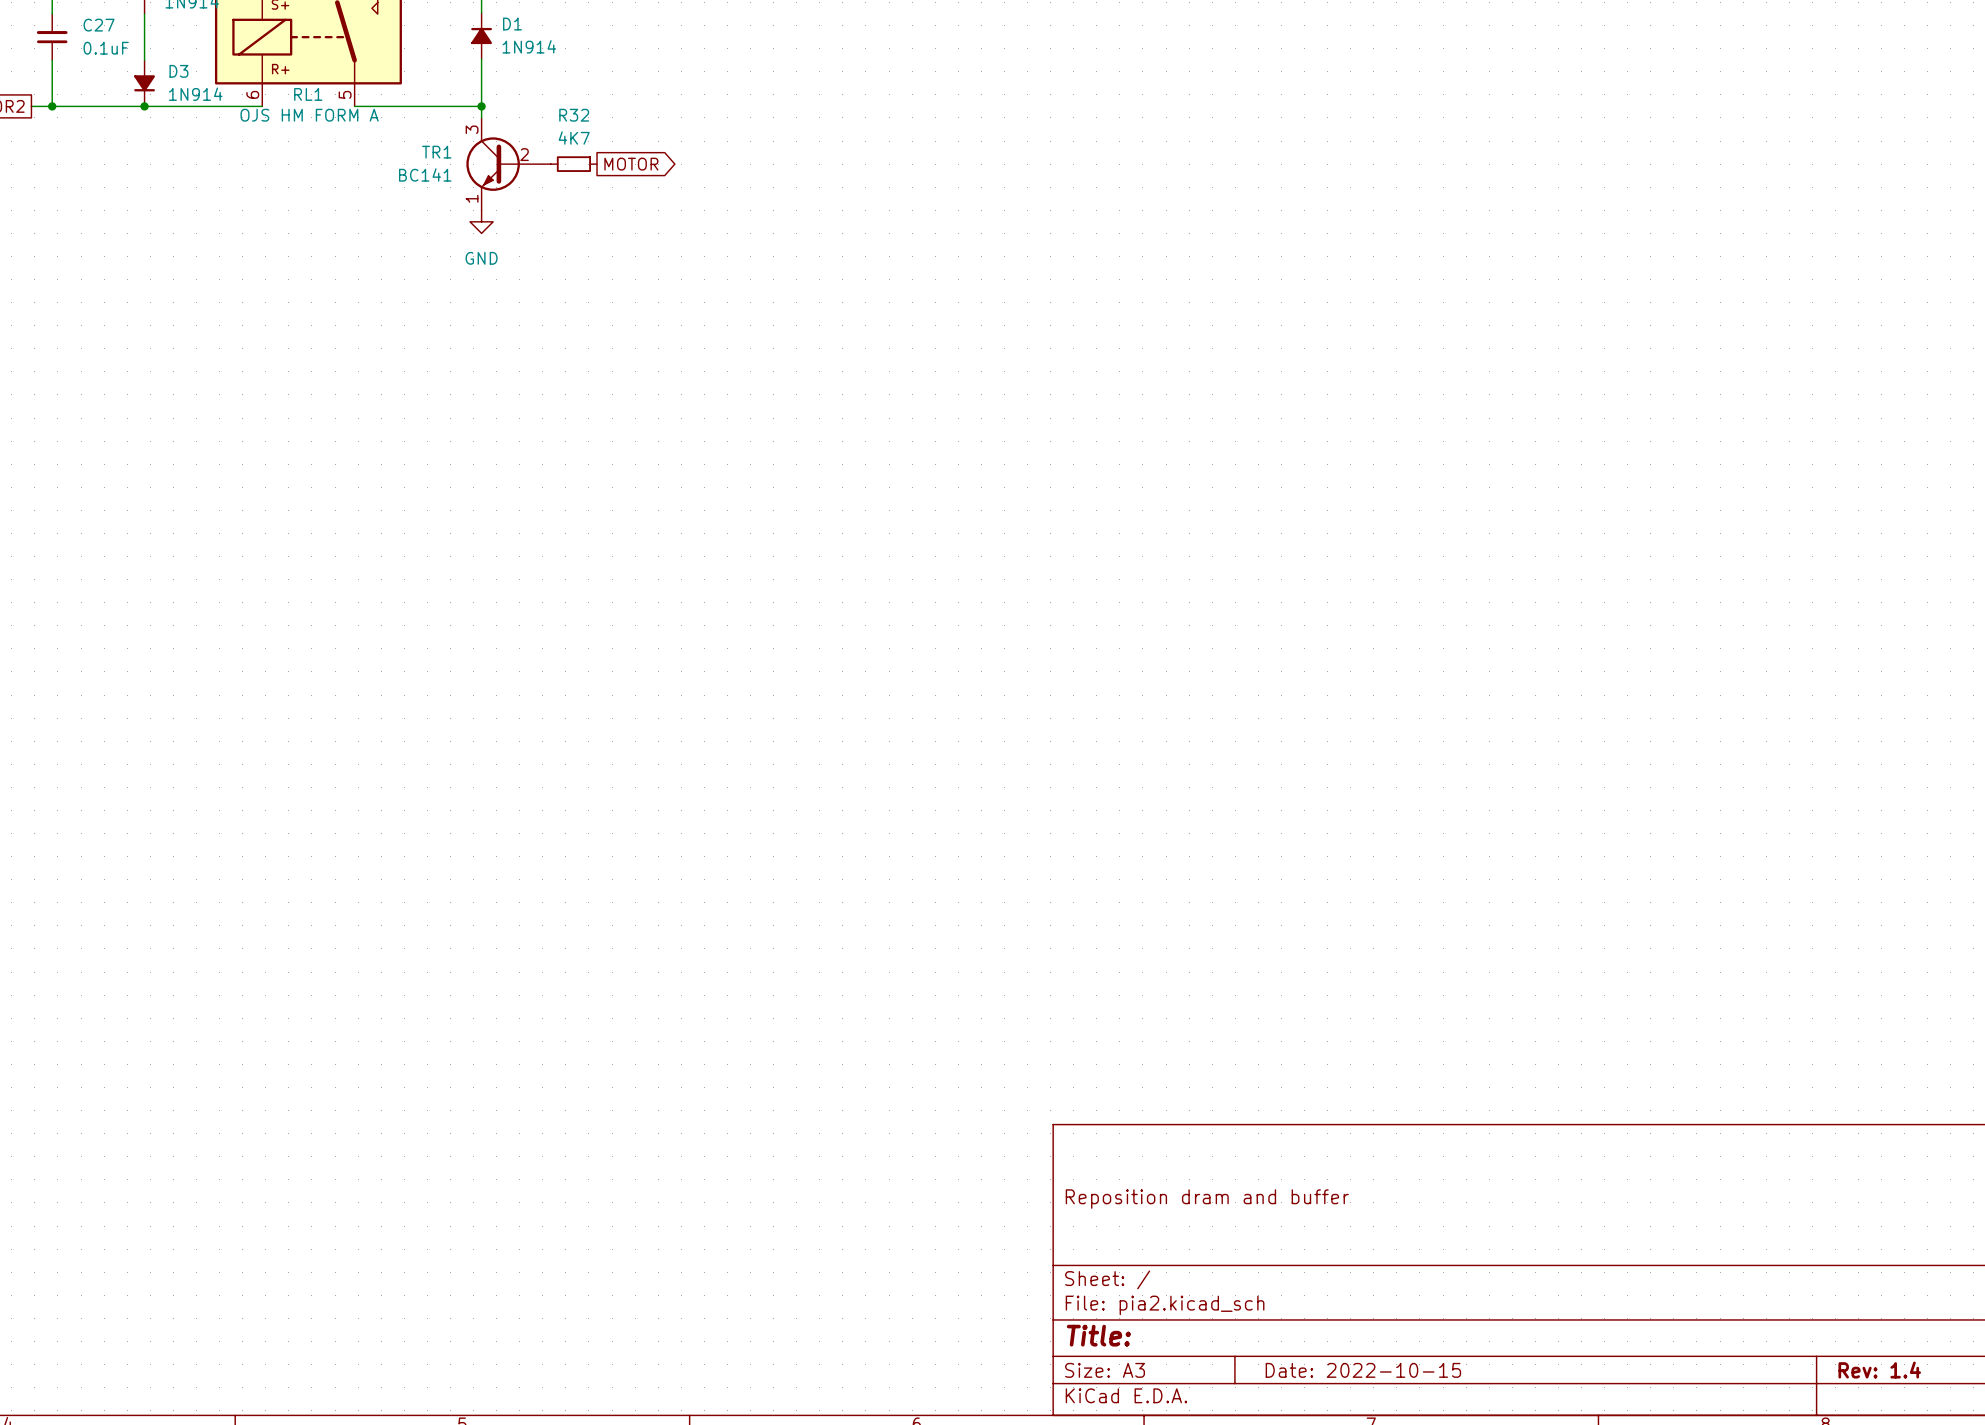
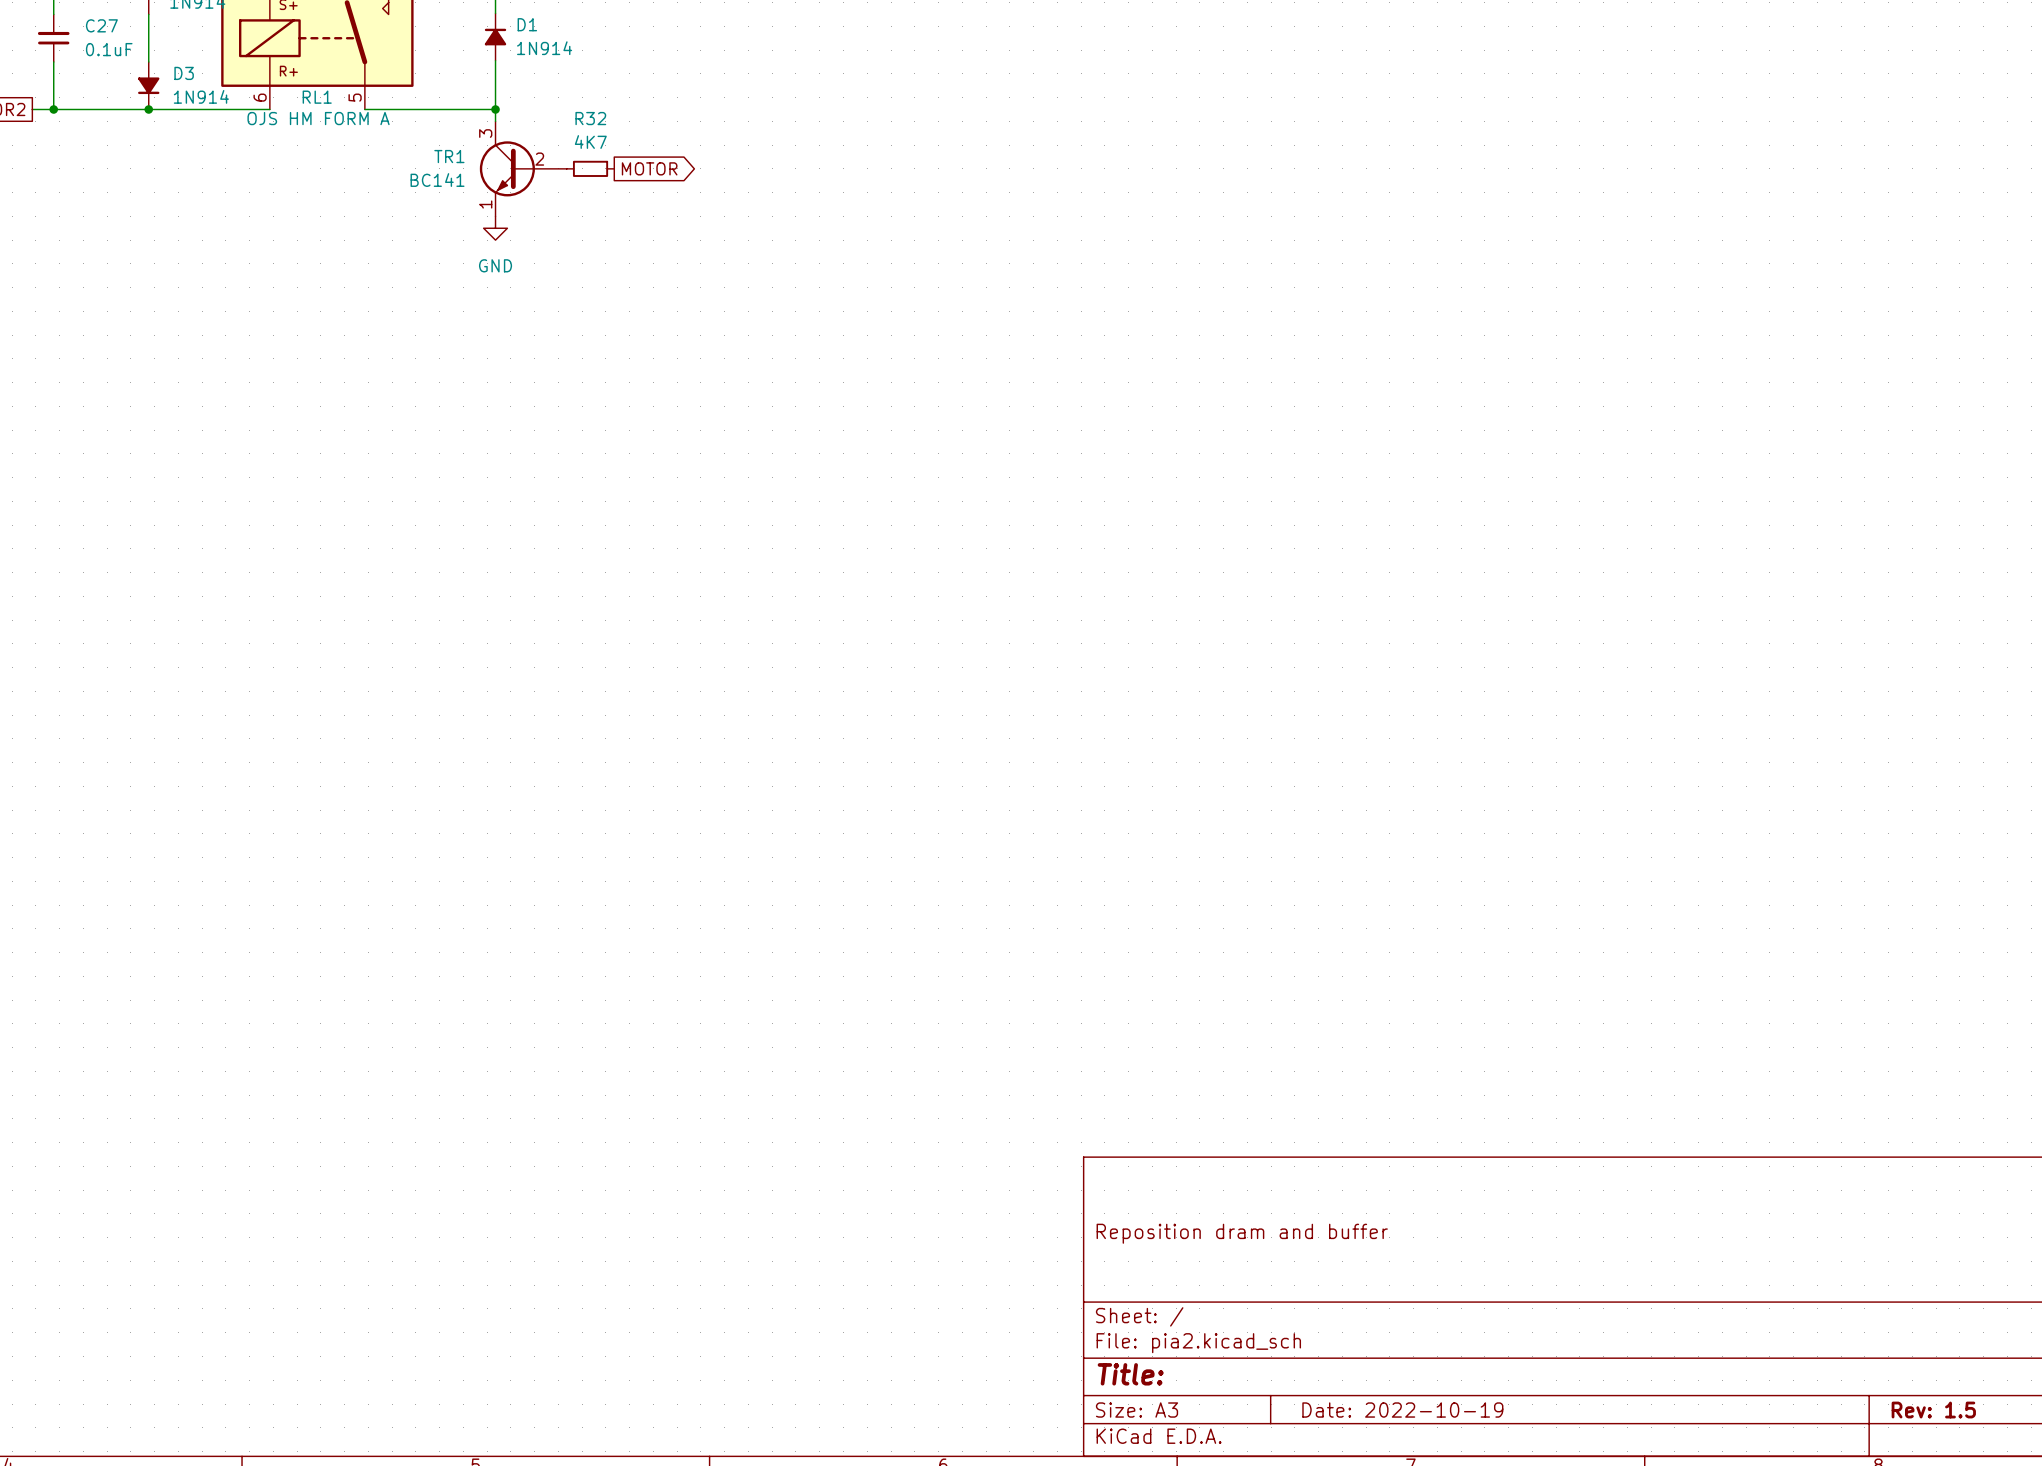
title block: Date: 2022-10-15 (1363, 1370) -> Date: 2022-10-19 (1402, 1410)
title block: Rev: 1.4 (1879, 1370) -> Rev: 1.5 (1933, 1410)

